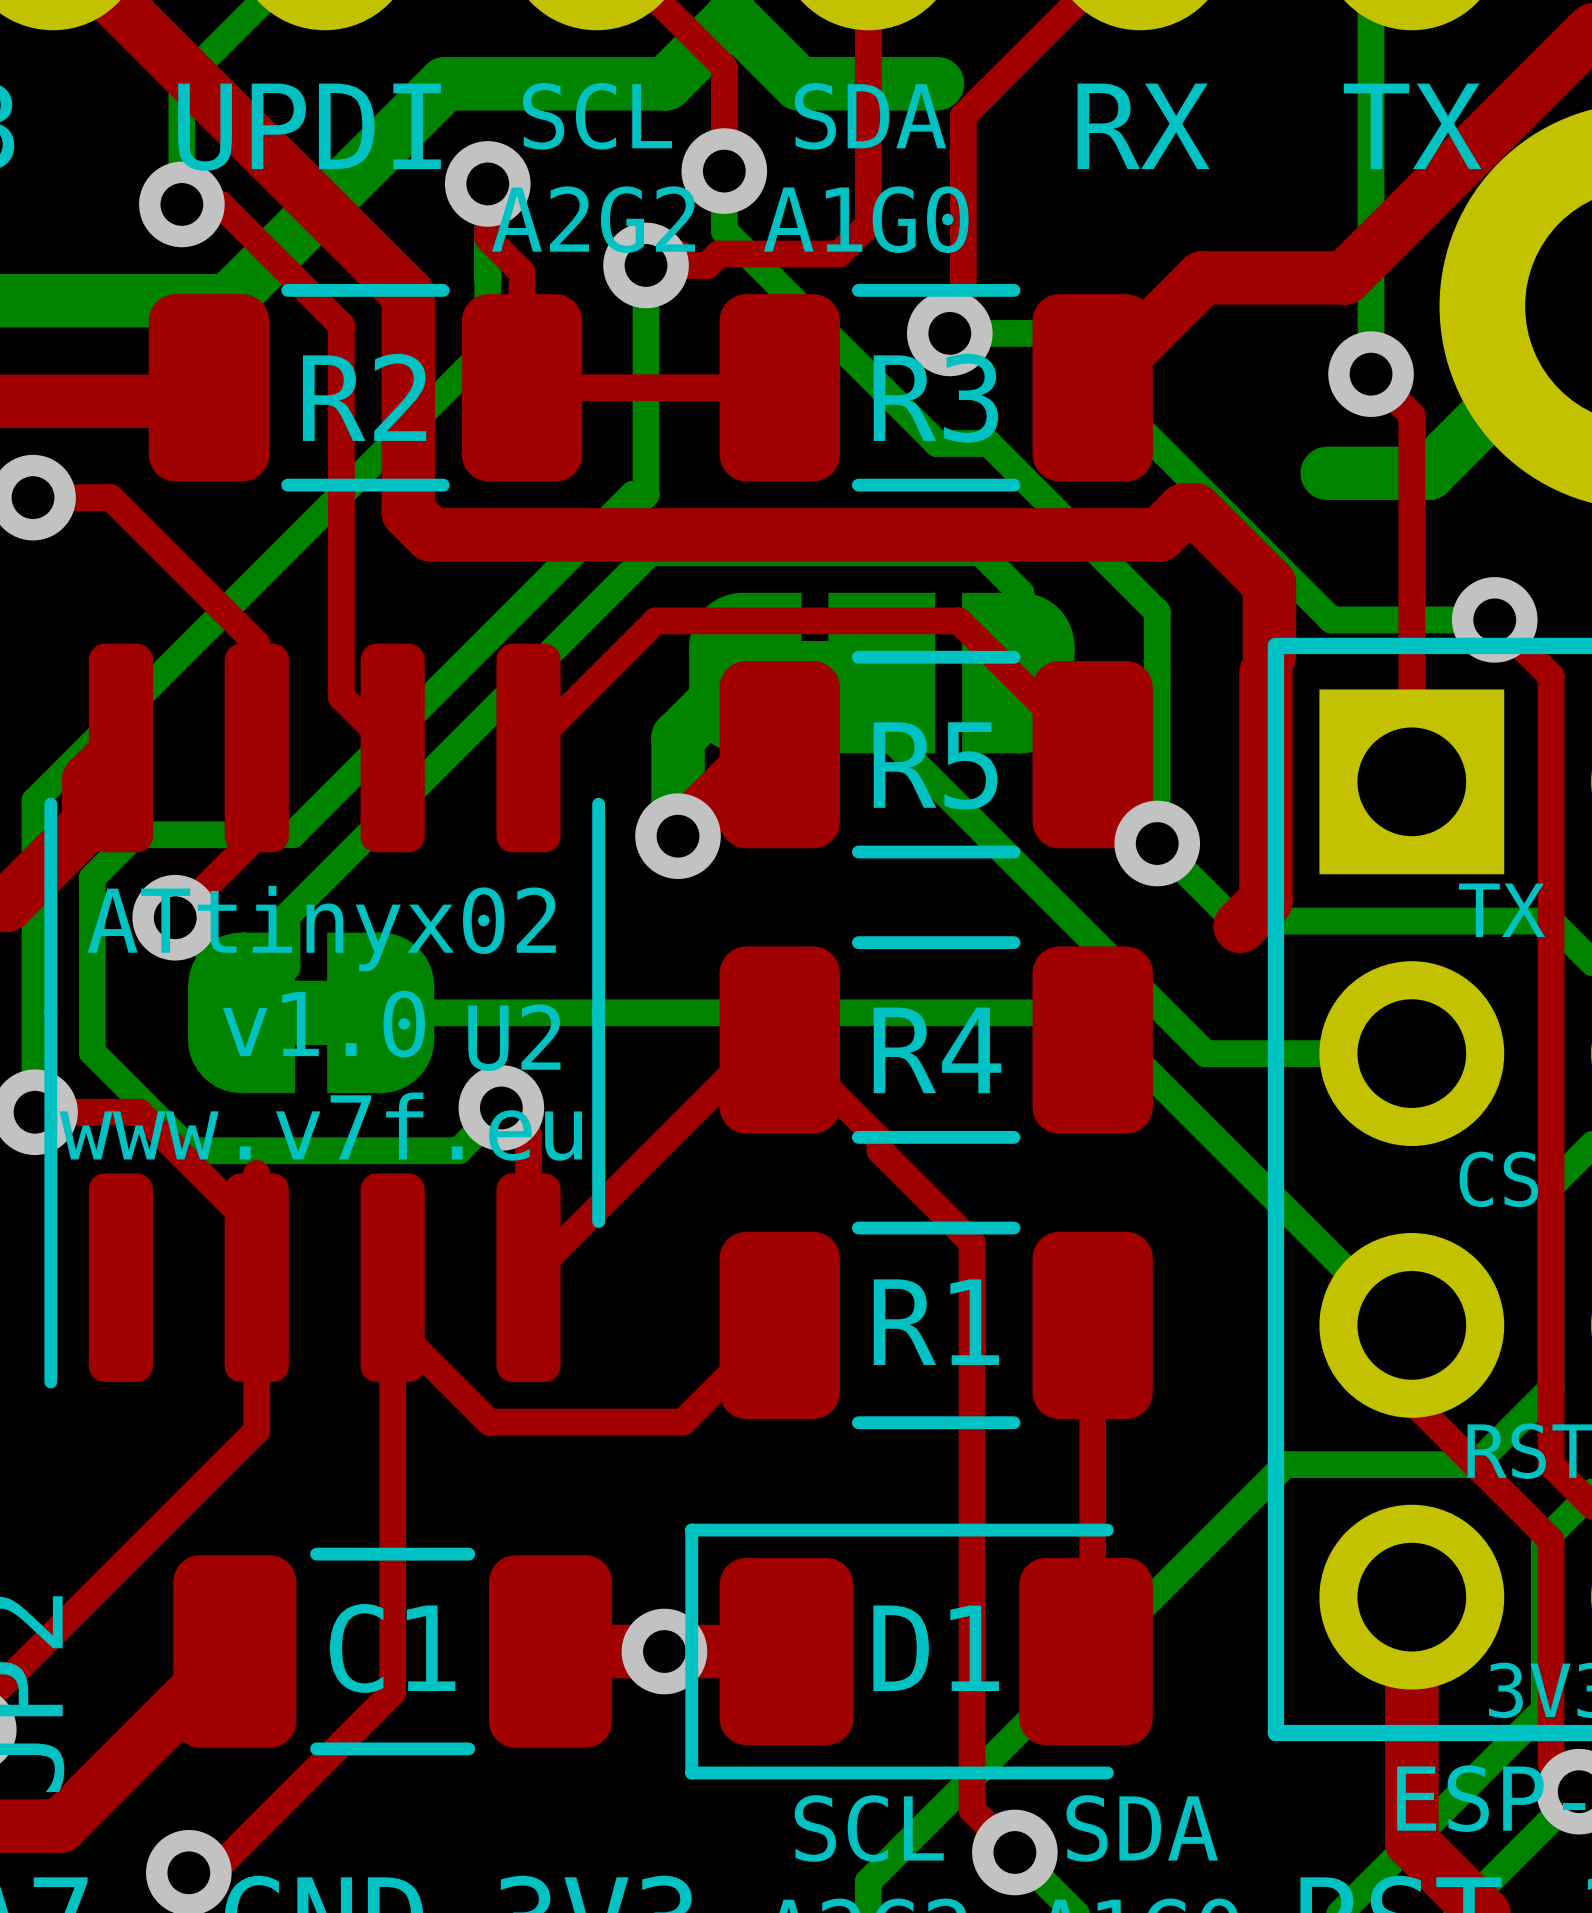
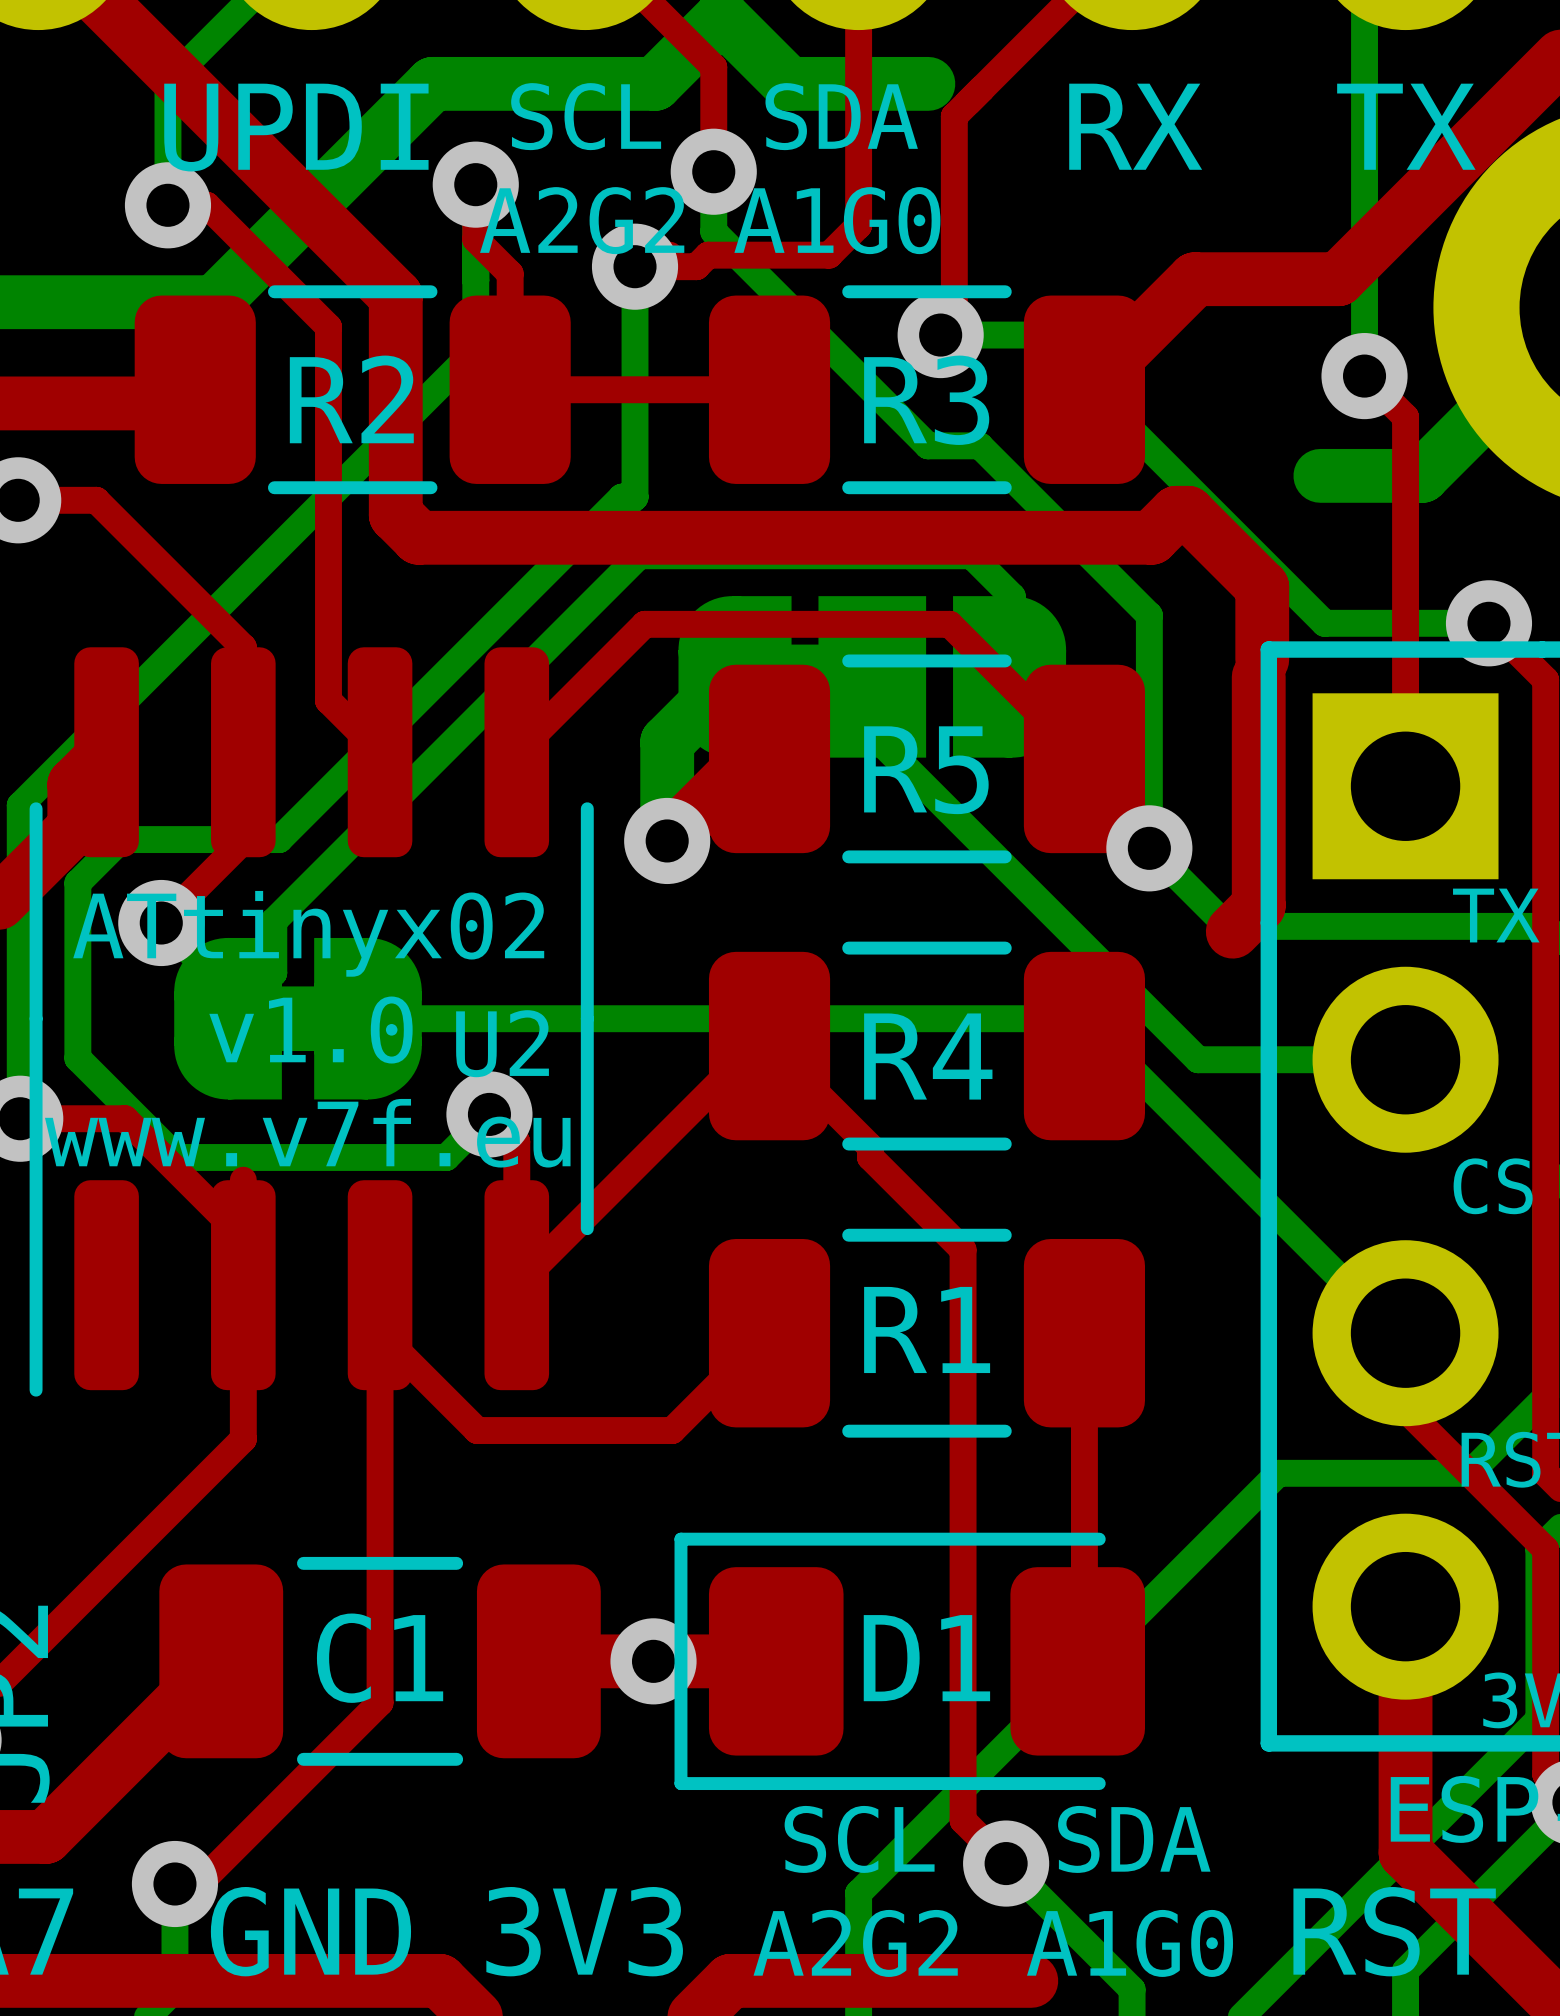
text position: SDA (870, 116) -> SDA (841, 116)
text position: A1G0 (866, 219) -> A1G0 (837, 220)

